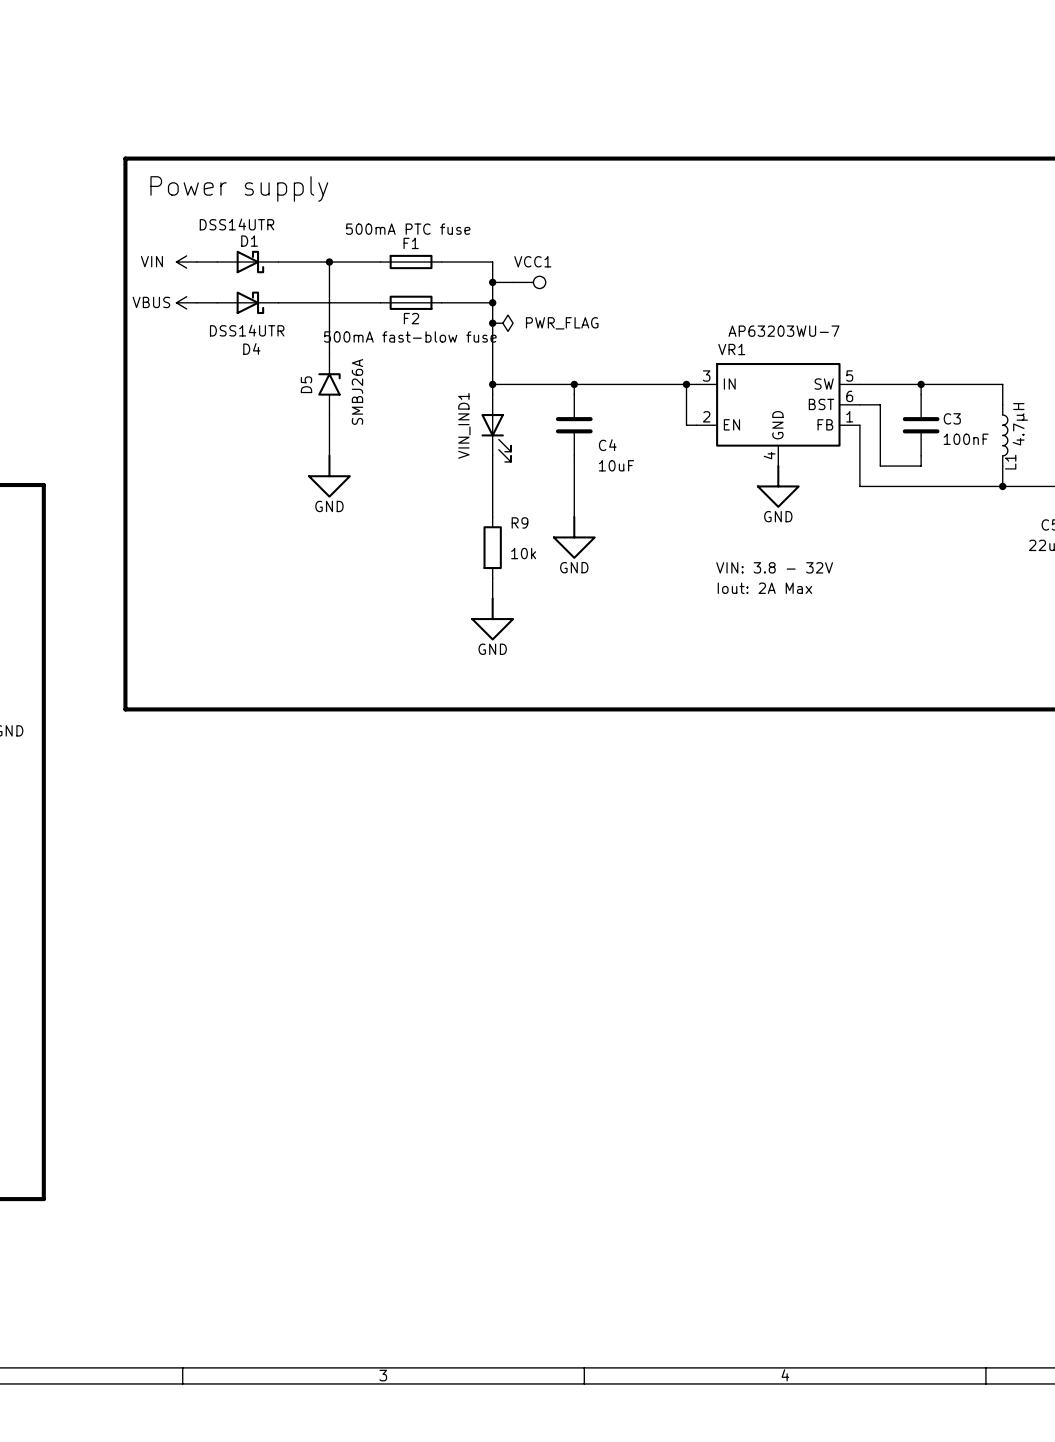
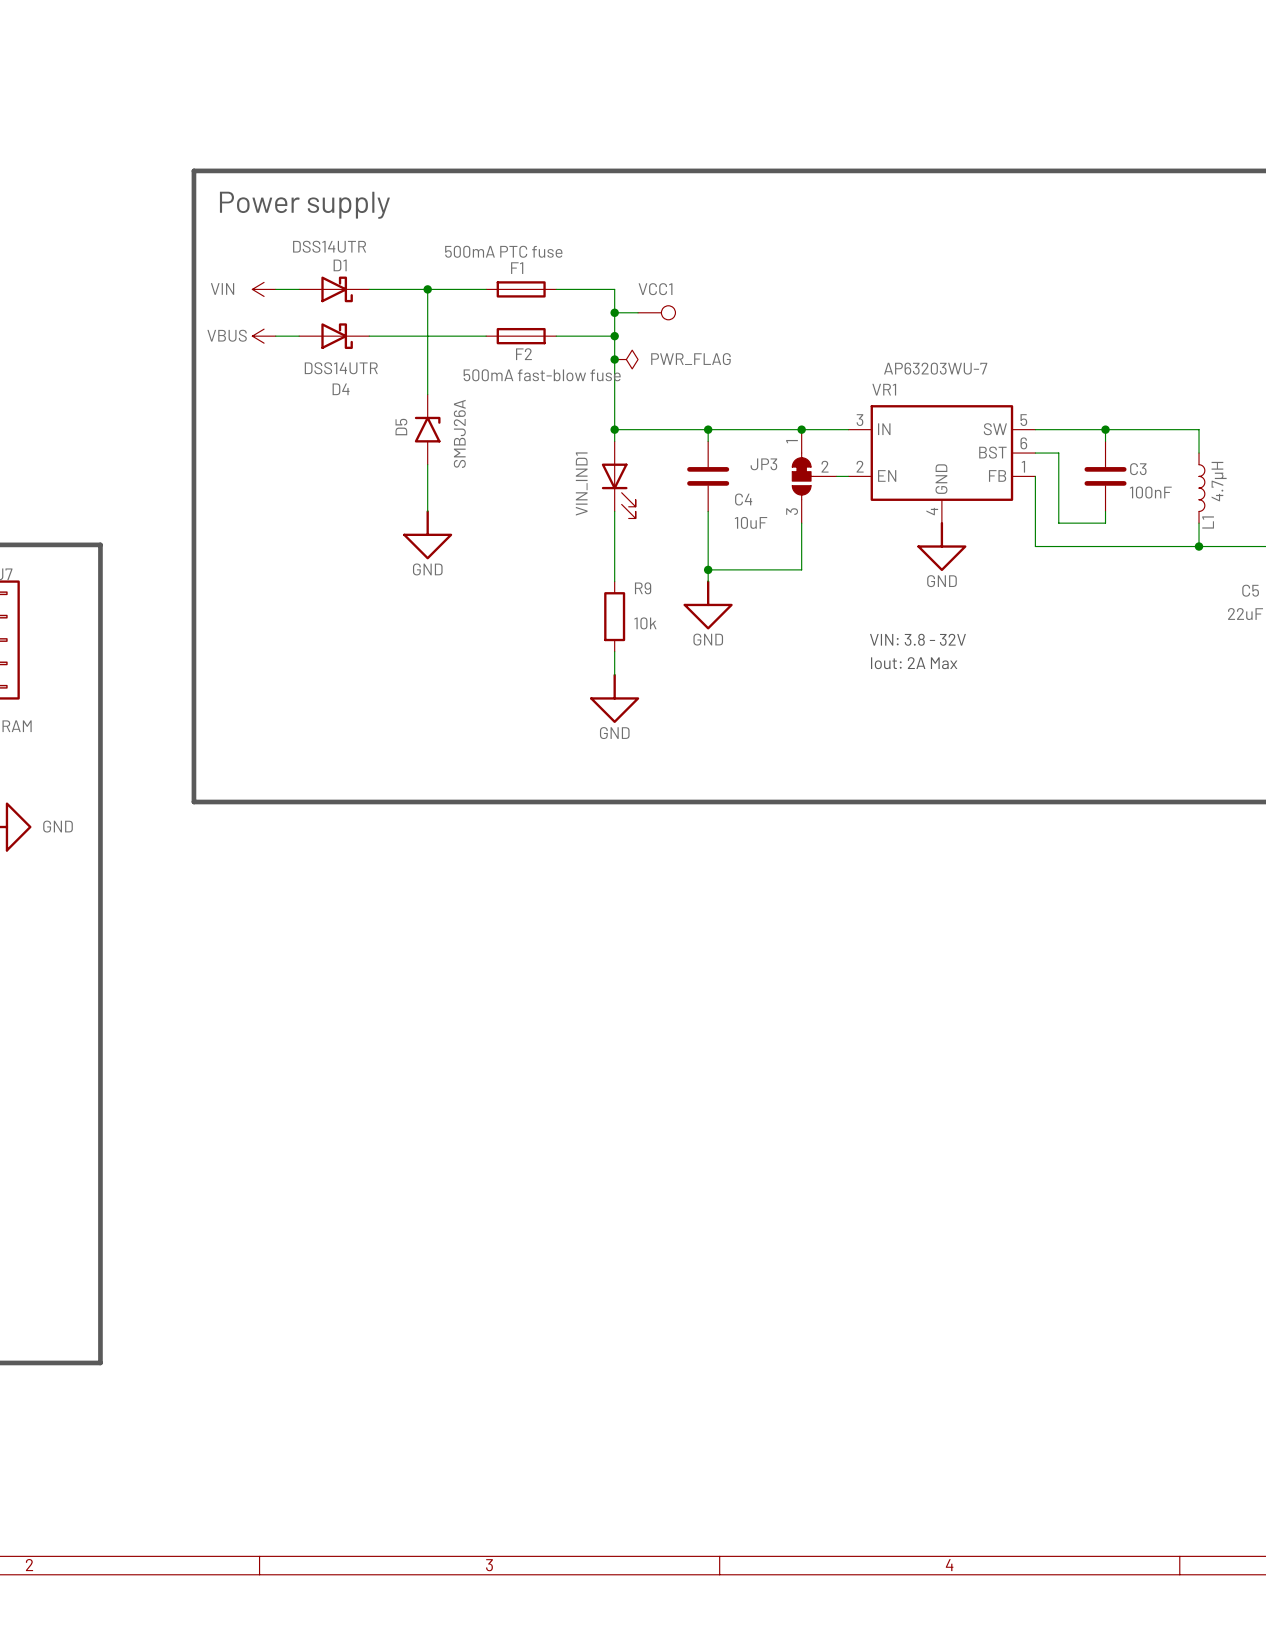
wire: (686, 384) (686, 425) -> none
junction position: (686, 384) -> (801, 429)
JP3: none -> (814, 476)
wire: none -> (801, 523) (801, 569) (708, 569)
junction: none -> (708, 569)

